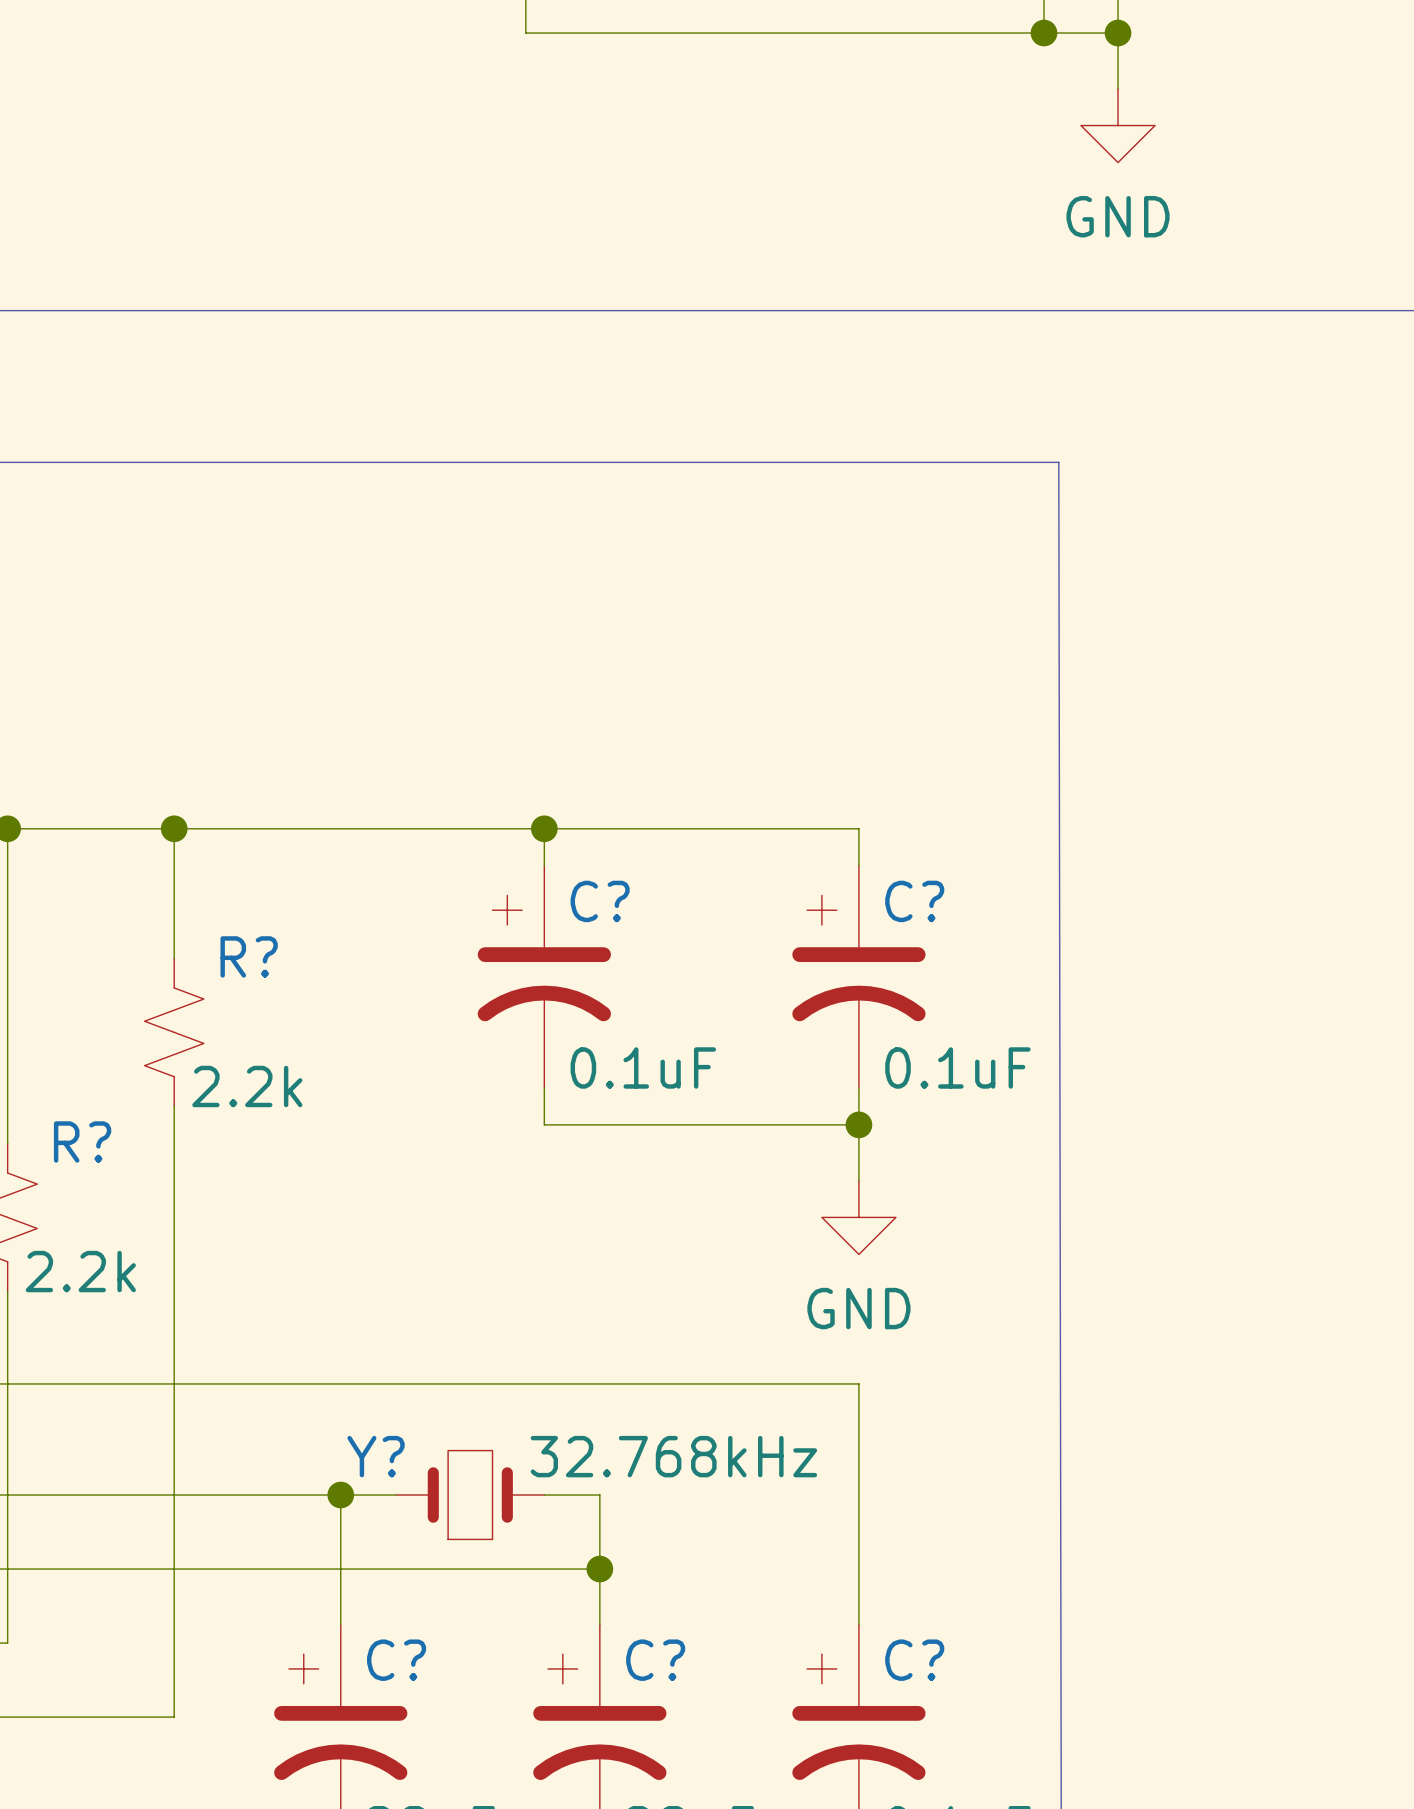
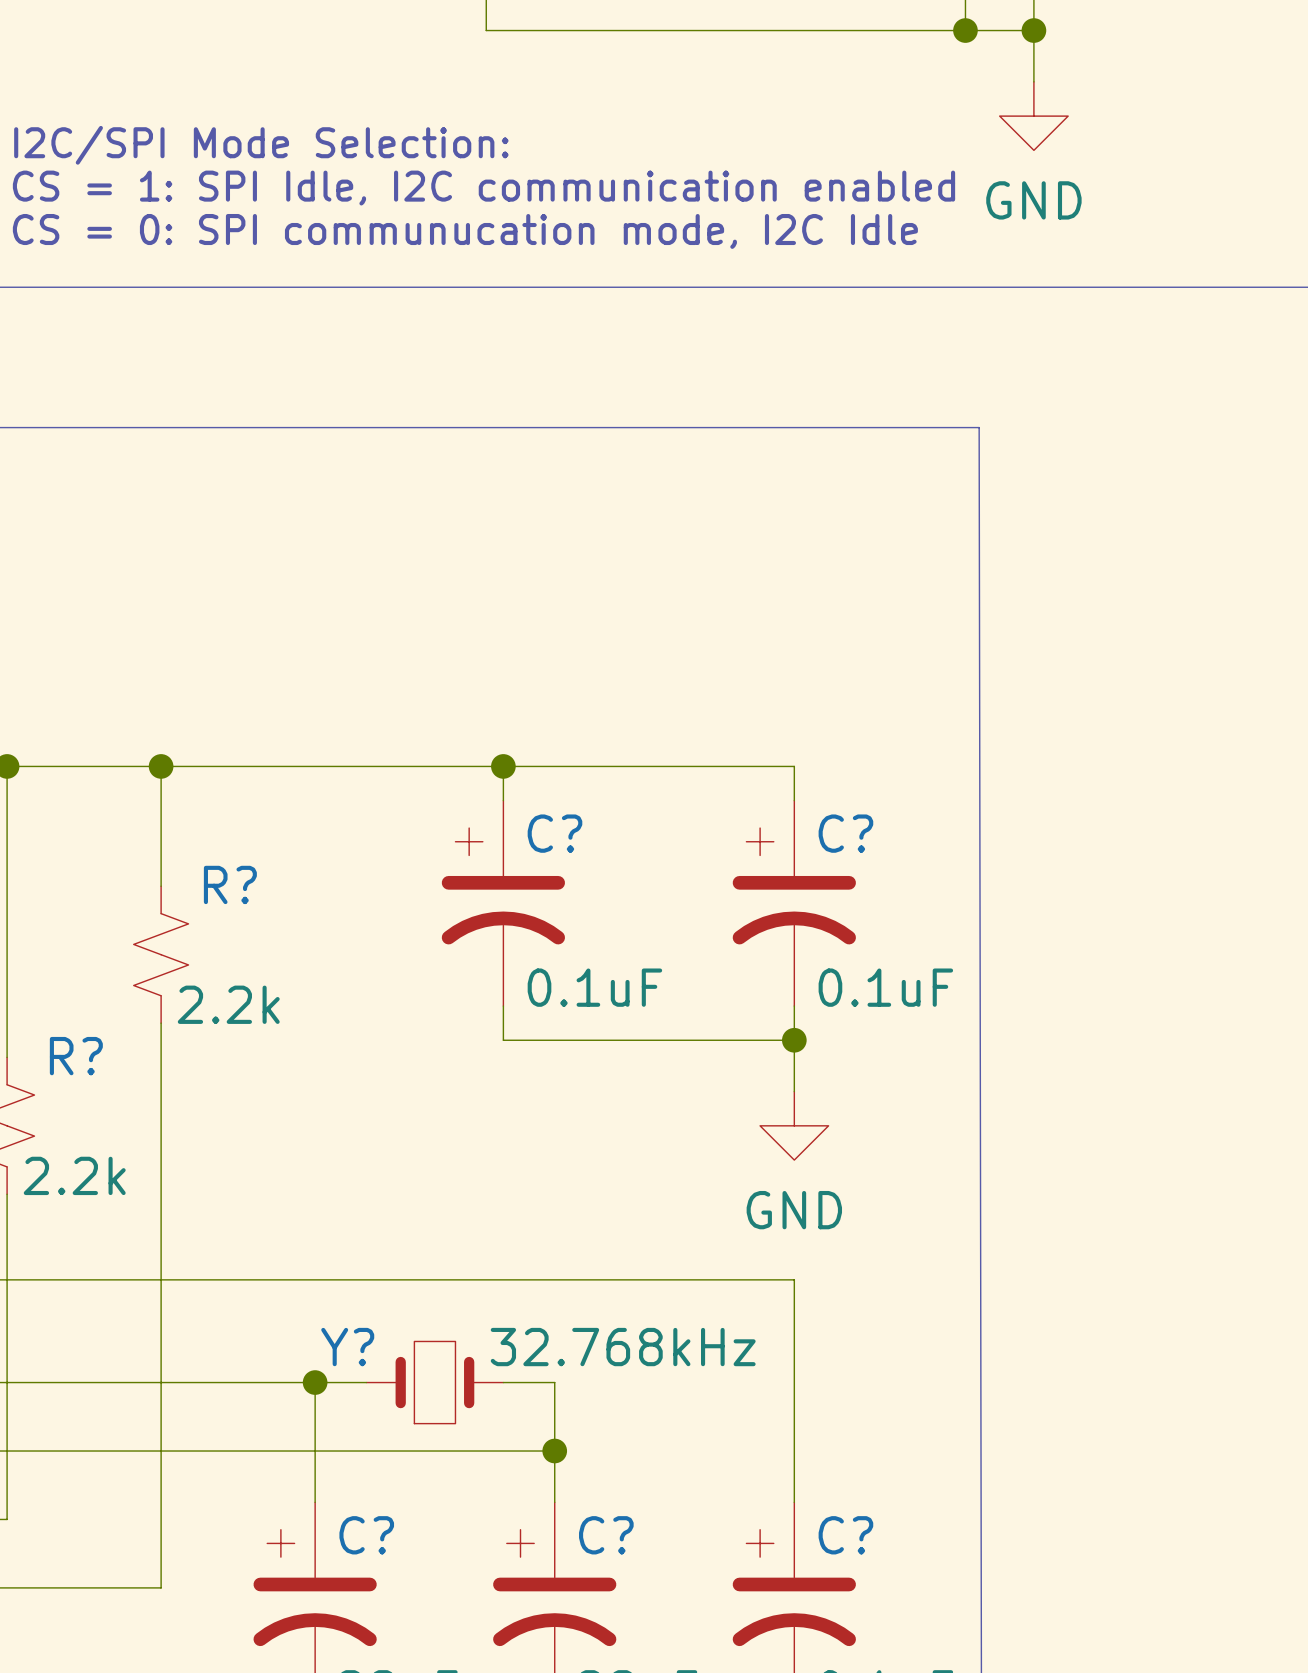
text: none -> I2C/SPI Mode Selection: (261, 145)
text: none -> CS = 1: SPI Idle, I2C communication enabled (483, 188)
text: none -> CS = 0: SPI communucation mode, I2C Idle (465, 231)

